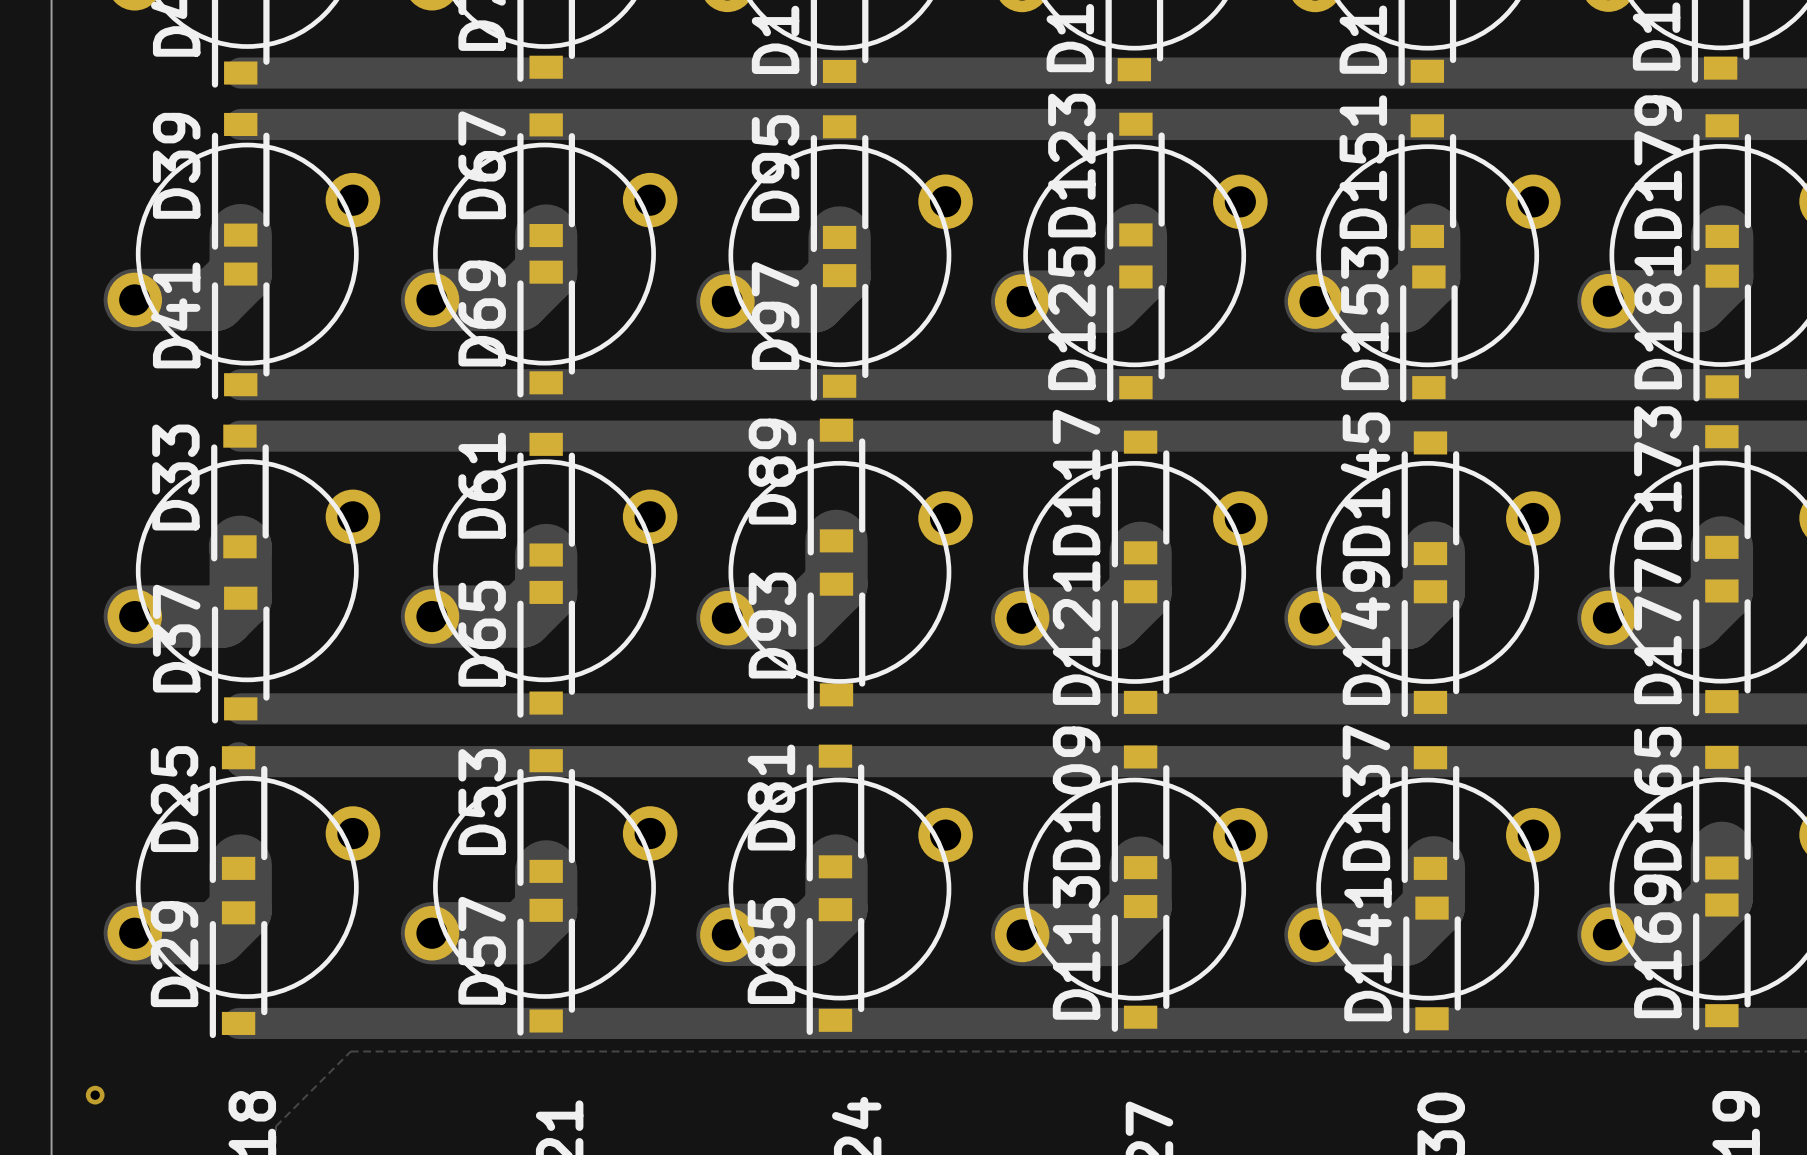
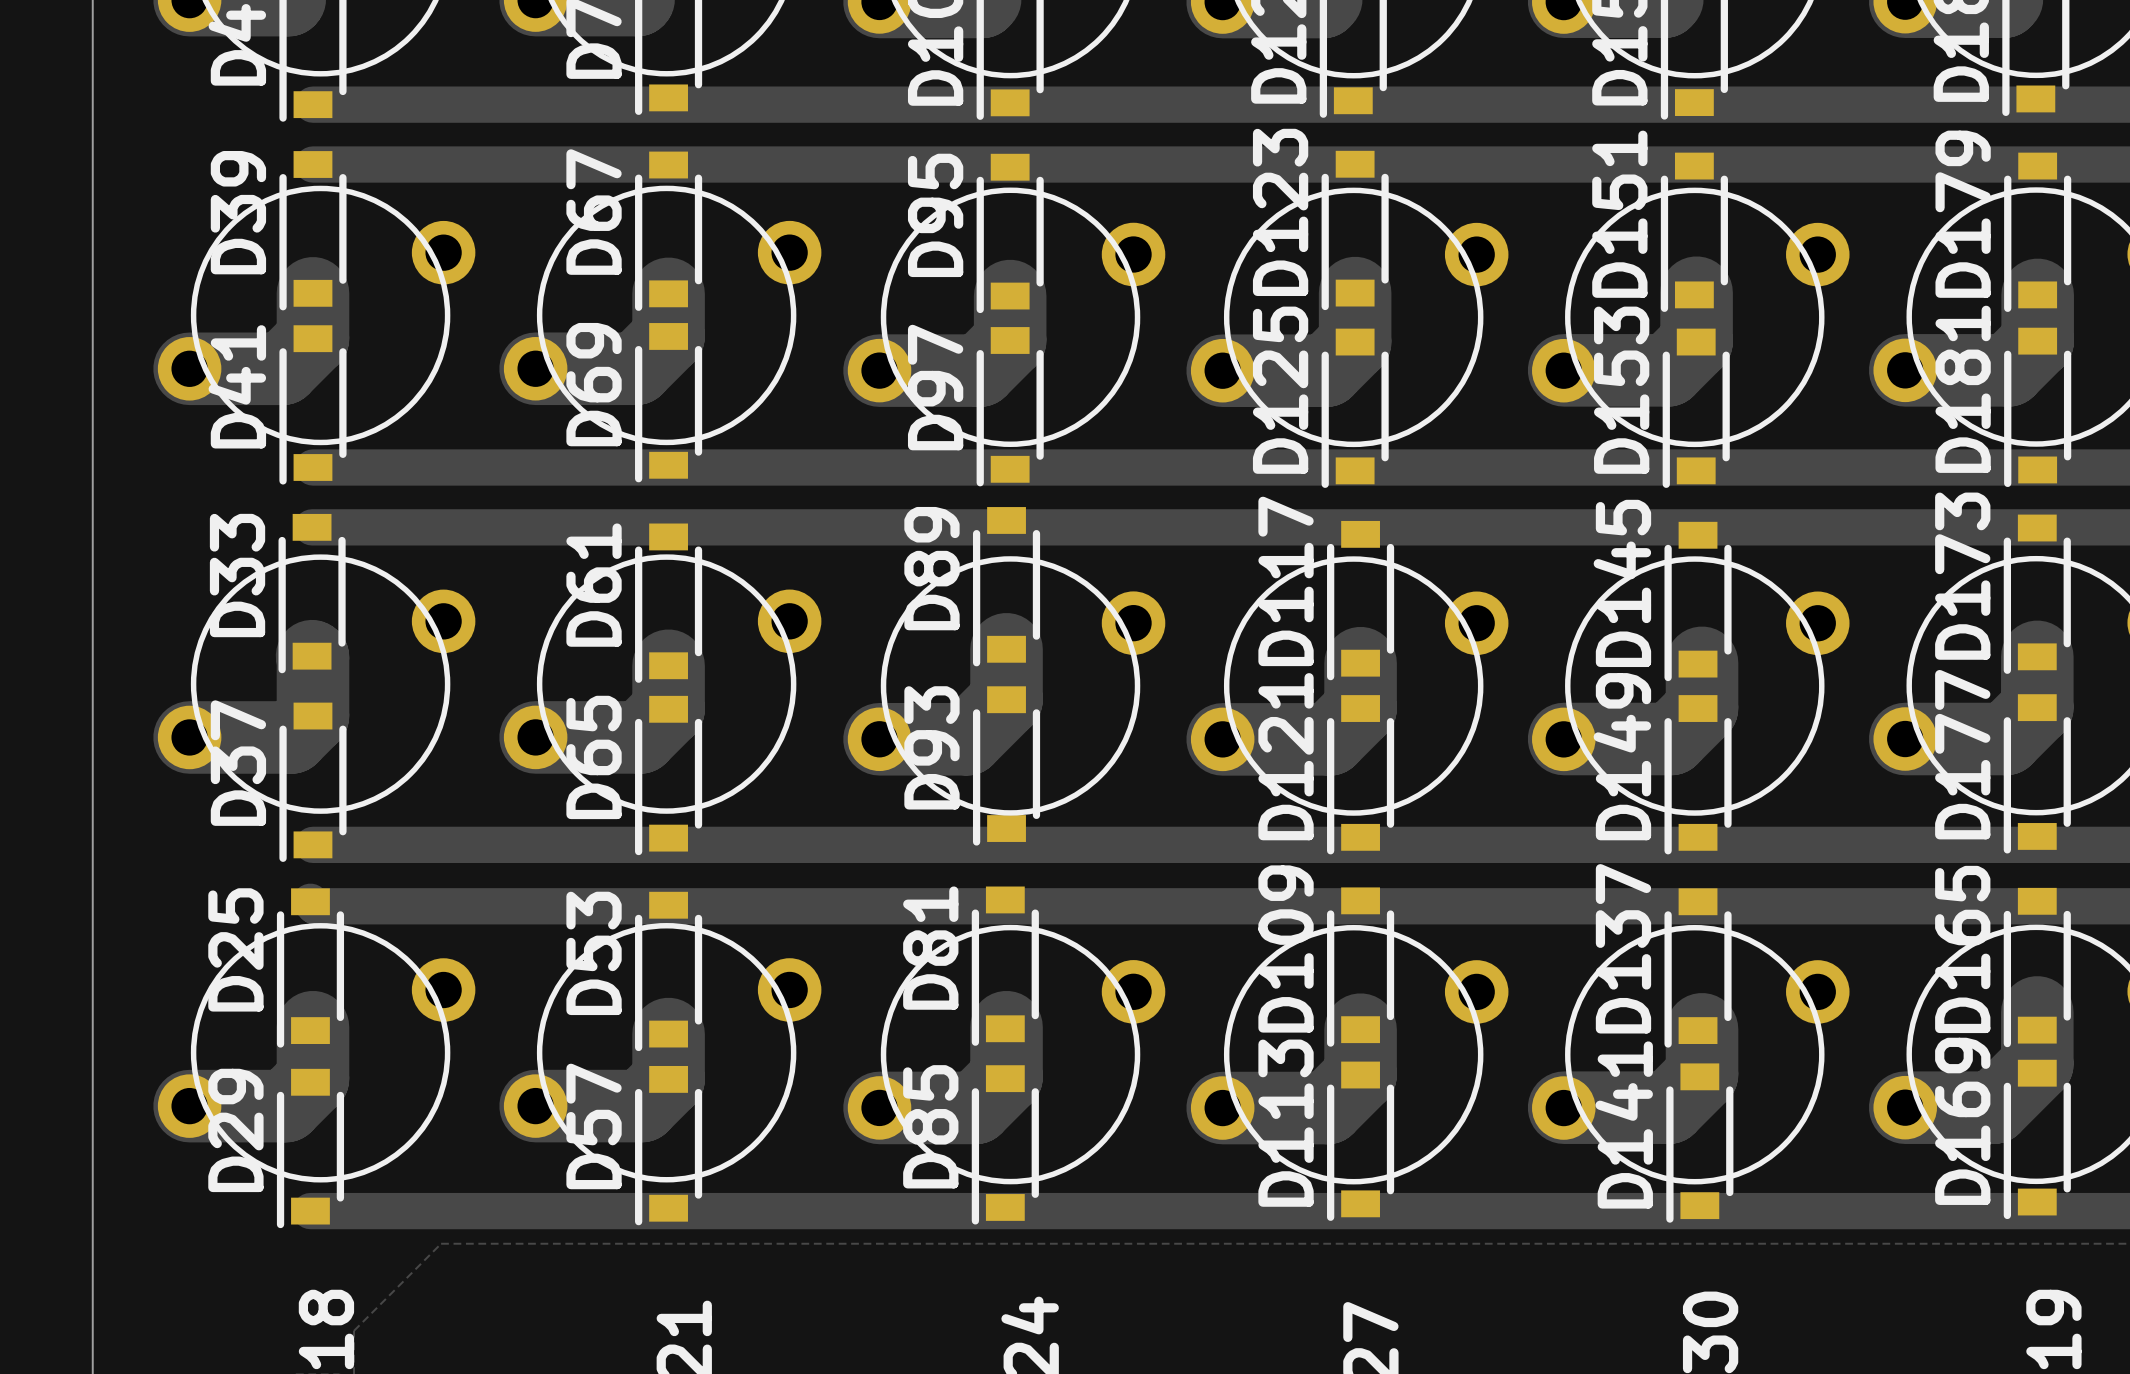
via: (95, 1095) -> none

